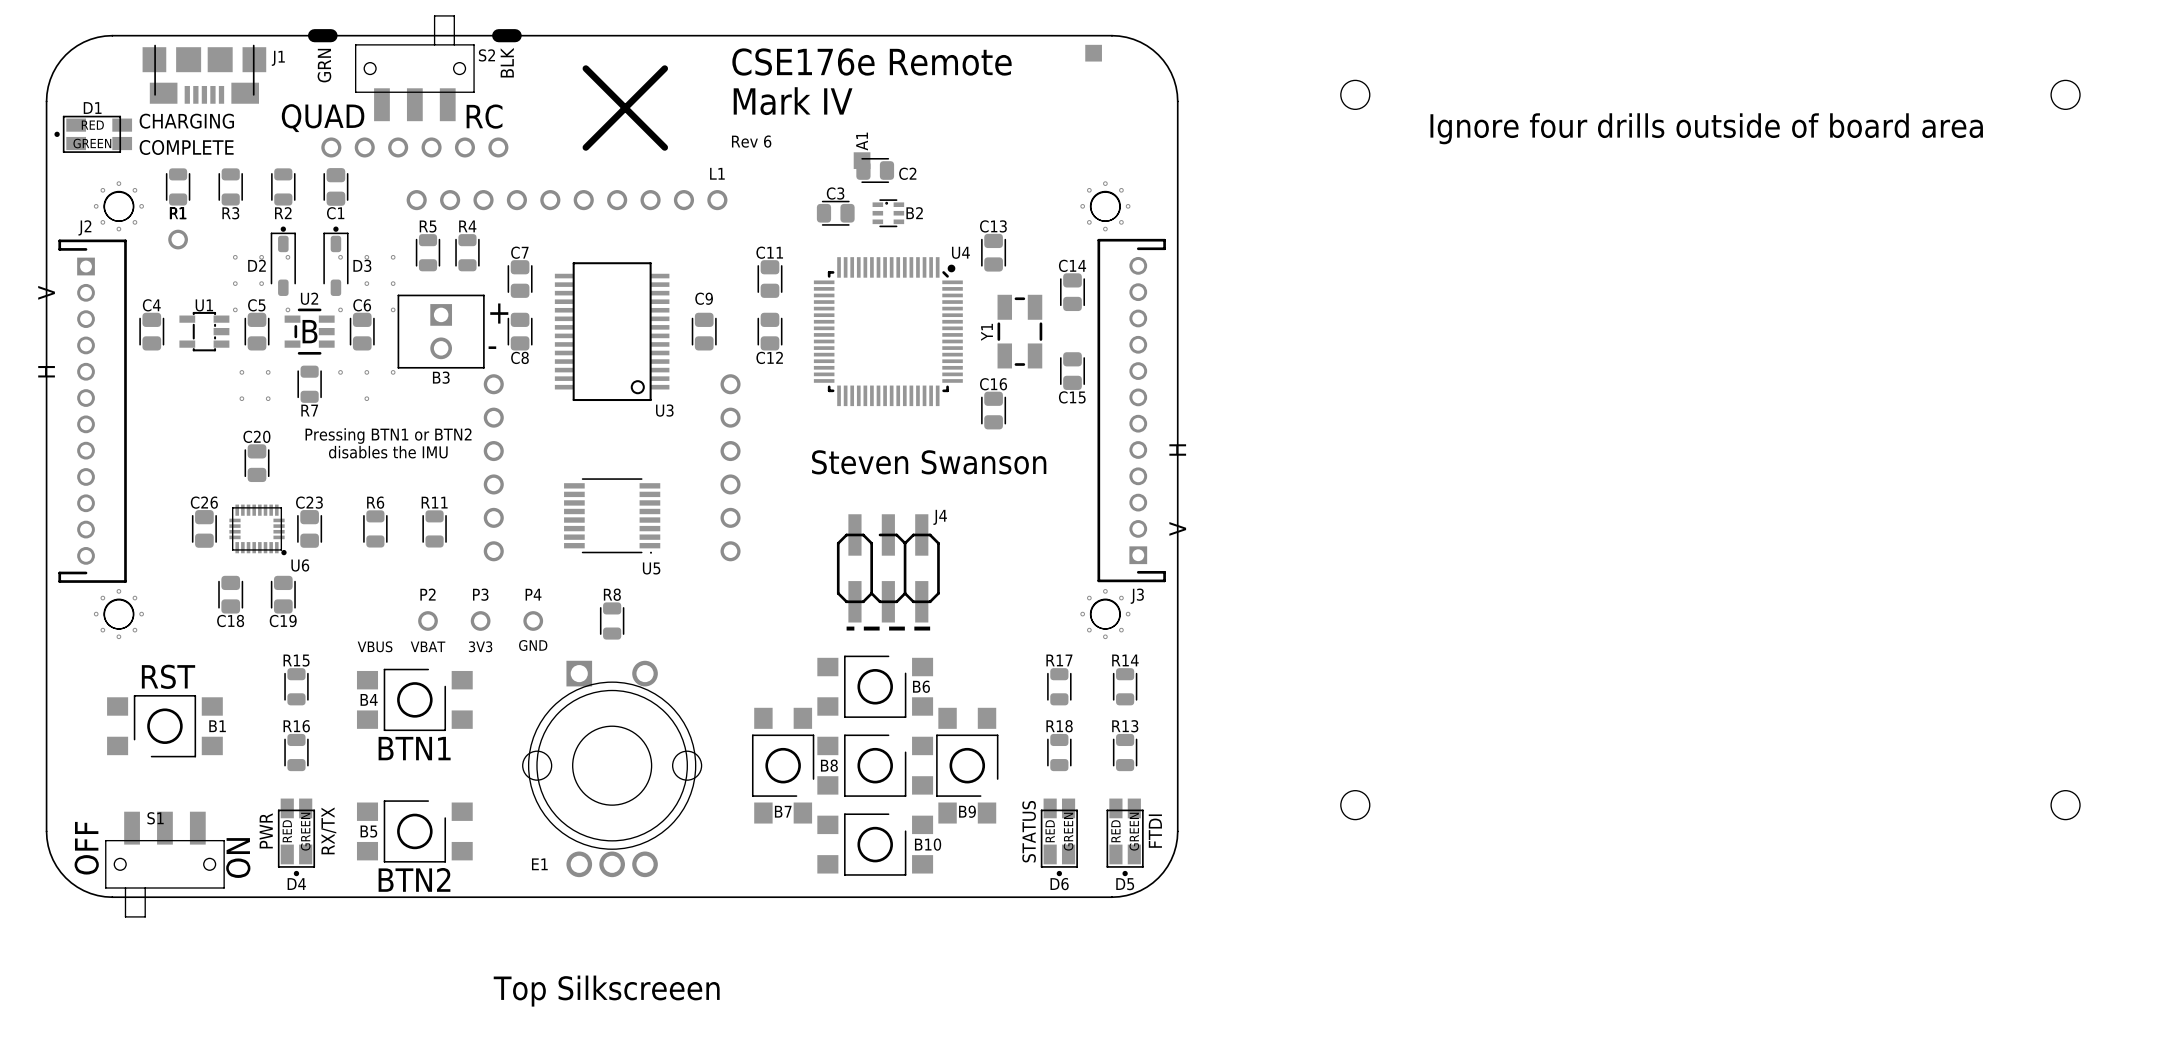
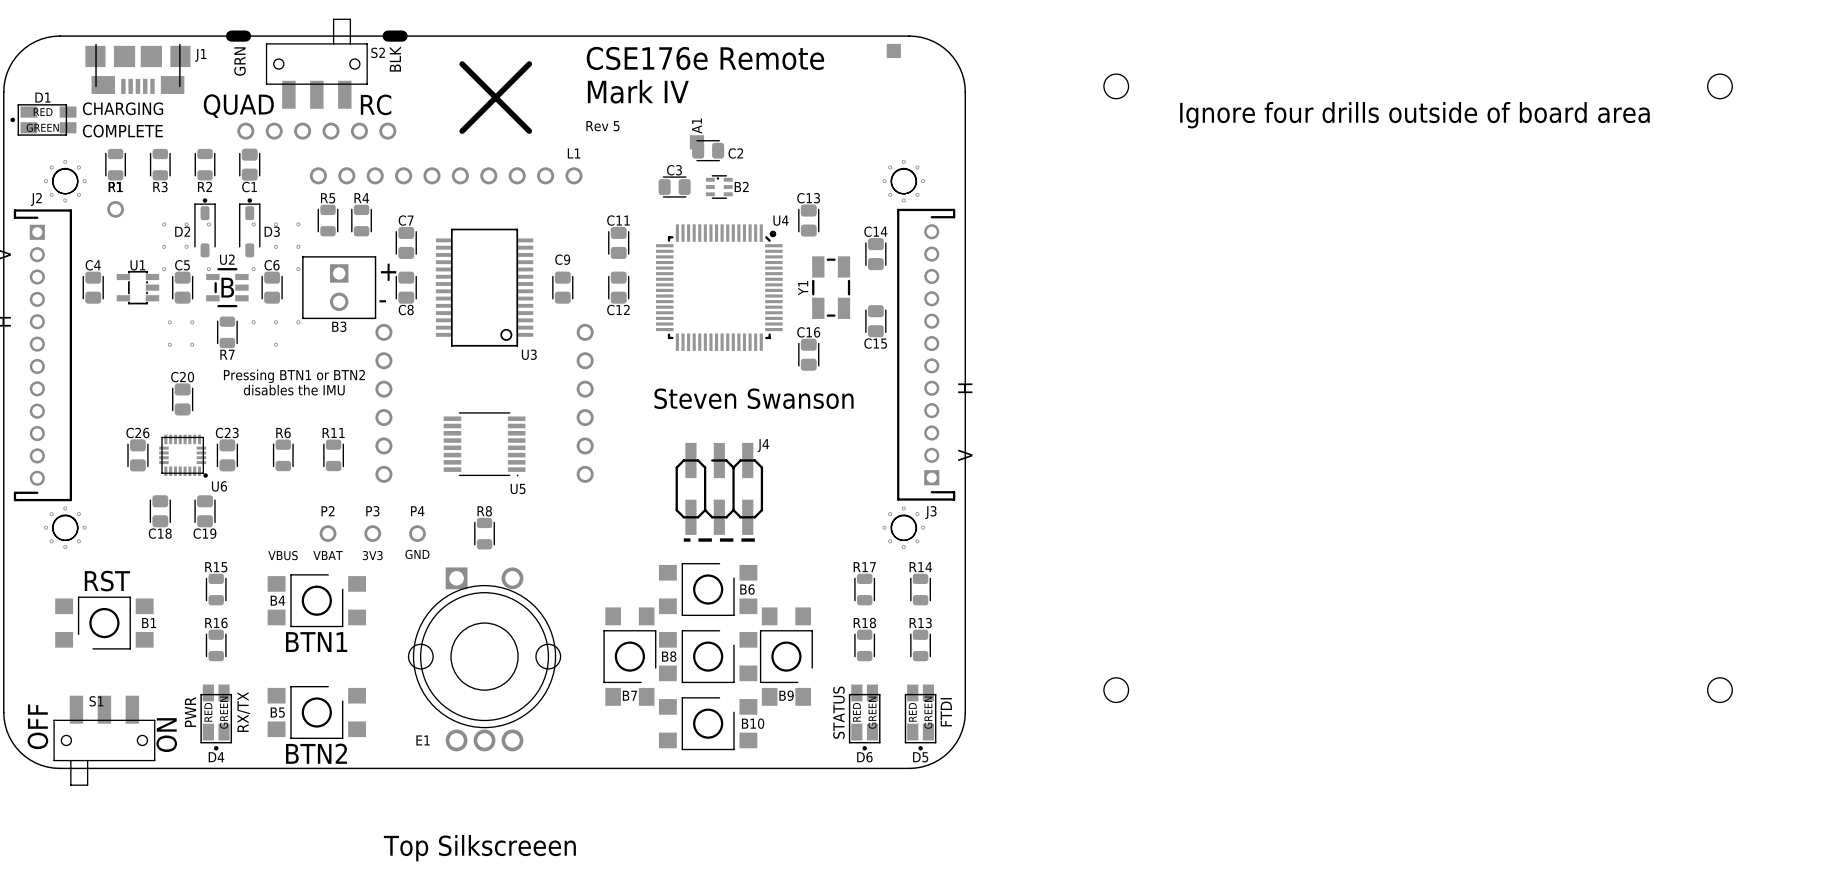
text: Rev 6 (751, 141) -> Rev 5 (602, 126)

